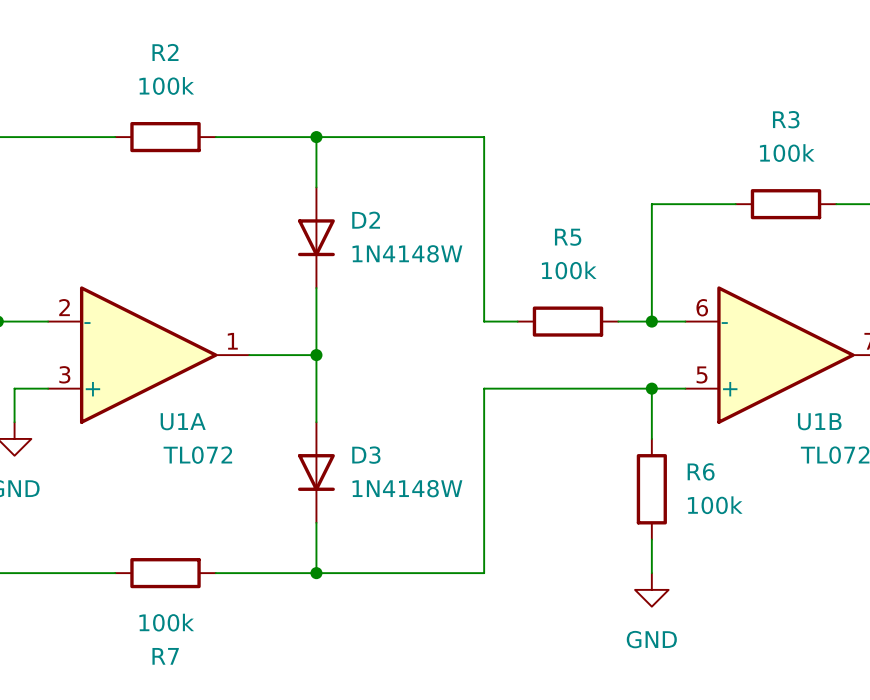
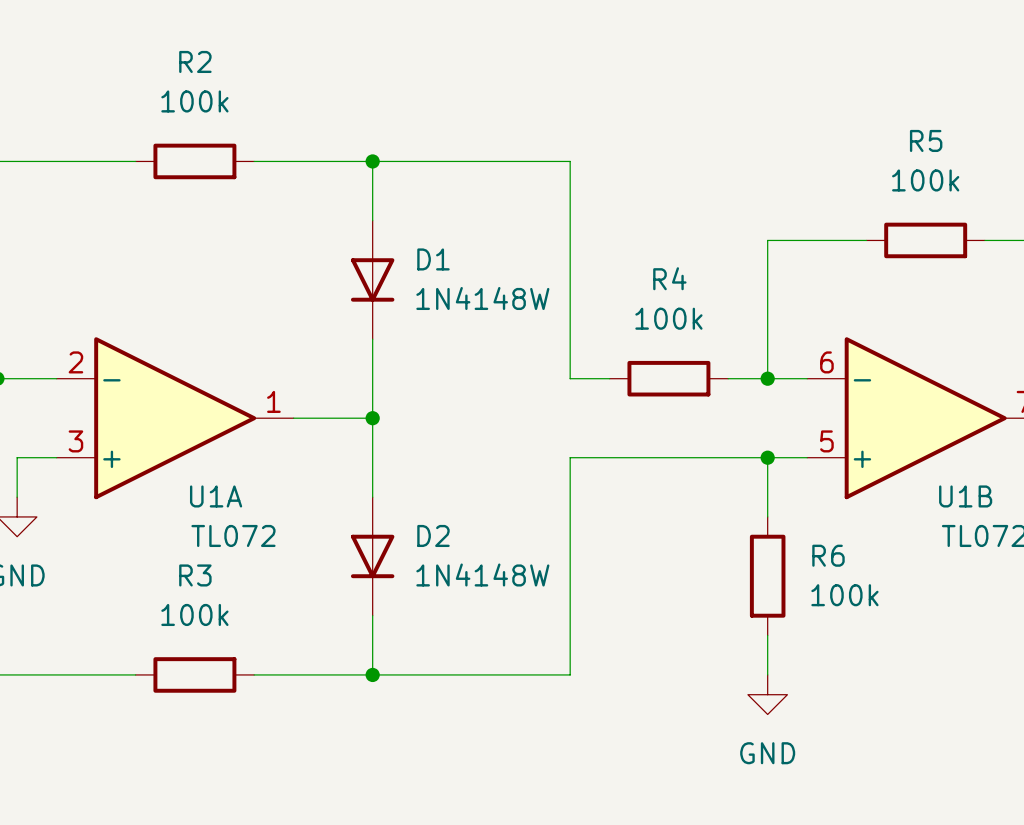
R3 name: R3 (786, 119) -> R5 (926, 140)
D2 name: D2 (366, 220) -> D1 (433, 259)
R5 name: R5 (568, 237) -> R4 (669, 278)
D3 name: D3 (366, 455) -> D2 (433, 535)
R7 value position: 100k (166, 622) -> 100k (194, 614)
R7 name: R7 (165, 656) -> R3 (195, 575)

